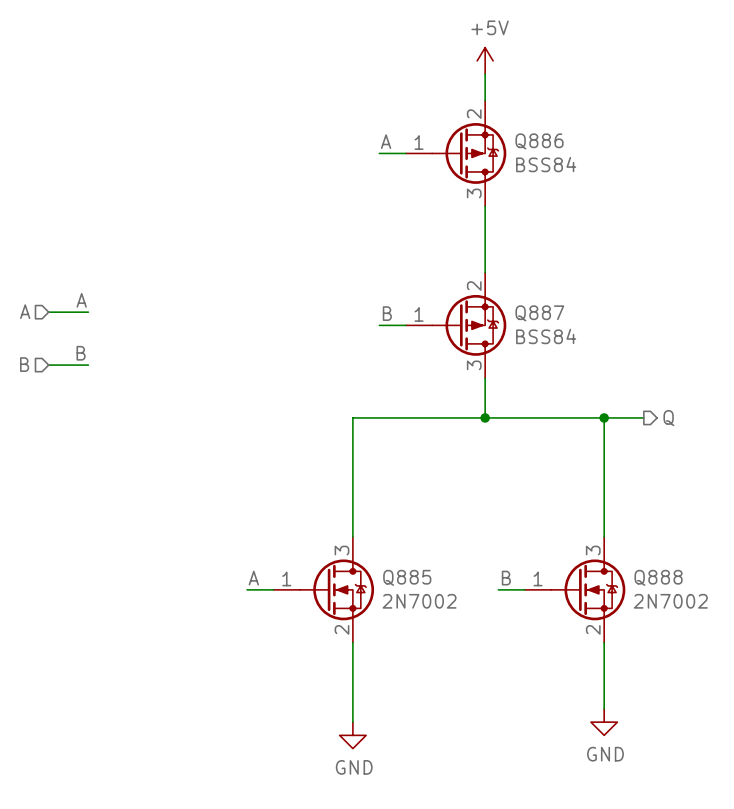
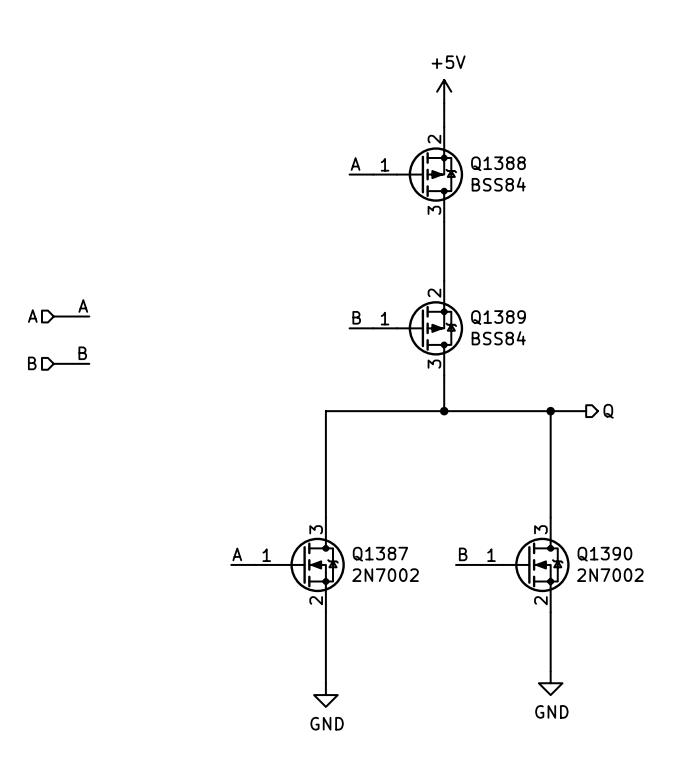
Q886 name: Q886 (539, 141) -> Q1388 (498, 163)
Q887 name: Q887 (539, 313) -> Q1389 (498, 317)
Q885 name: Q885 (407, 577) -> Q1387 (380, 554)
Q888 name: Q888 (658, 577) -> Q1390 (604, 554)

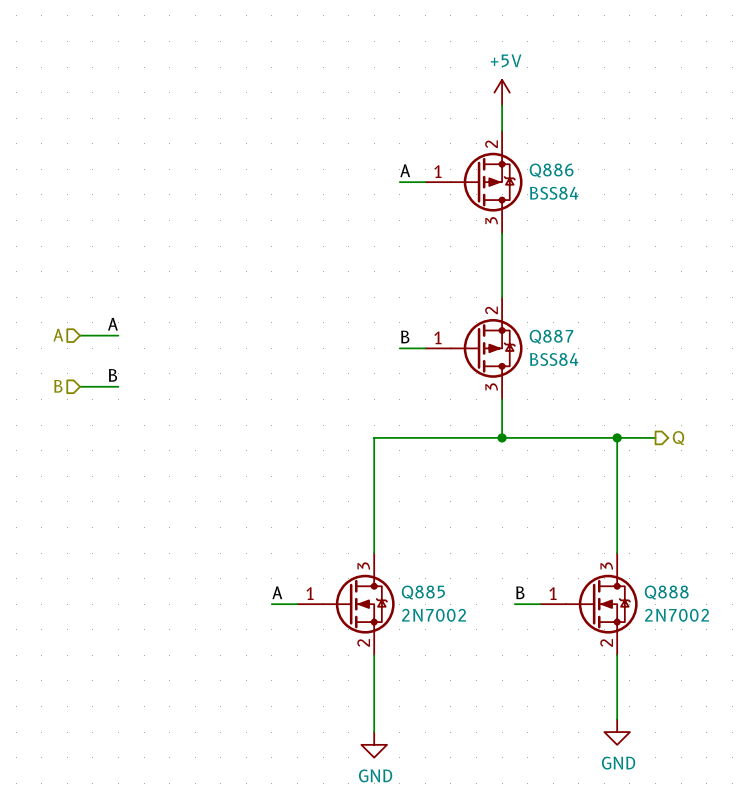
Q1388 name: Q1388 (498, 163) -> Q886 (551, 170)
Q1389 name: Q1389 (498, 317) -> Q887 (551, 336)
Q1387 name: Q1387 (380, 554) -> Q885 (423, 592)
Q1390 name: Q1390 (604, 554) -> Q888 (666, 592)

